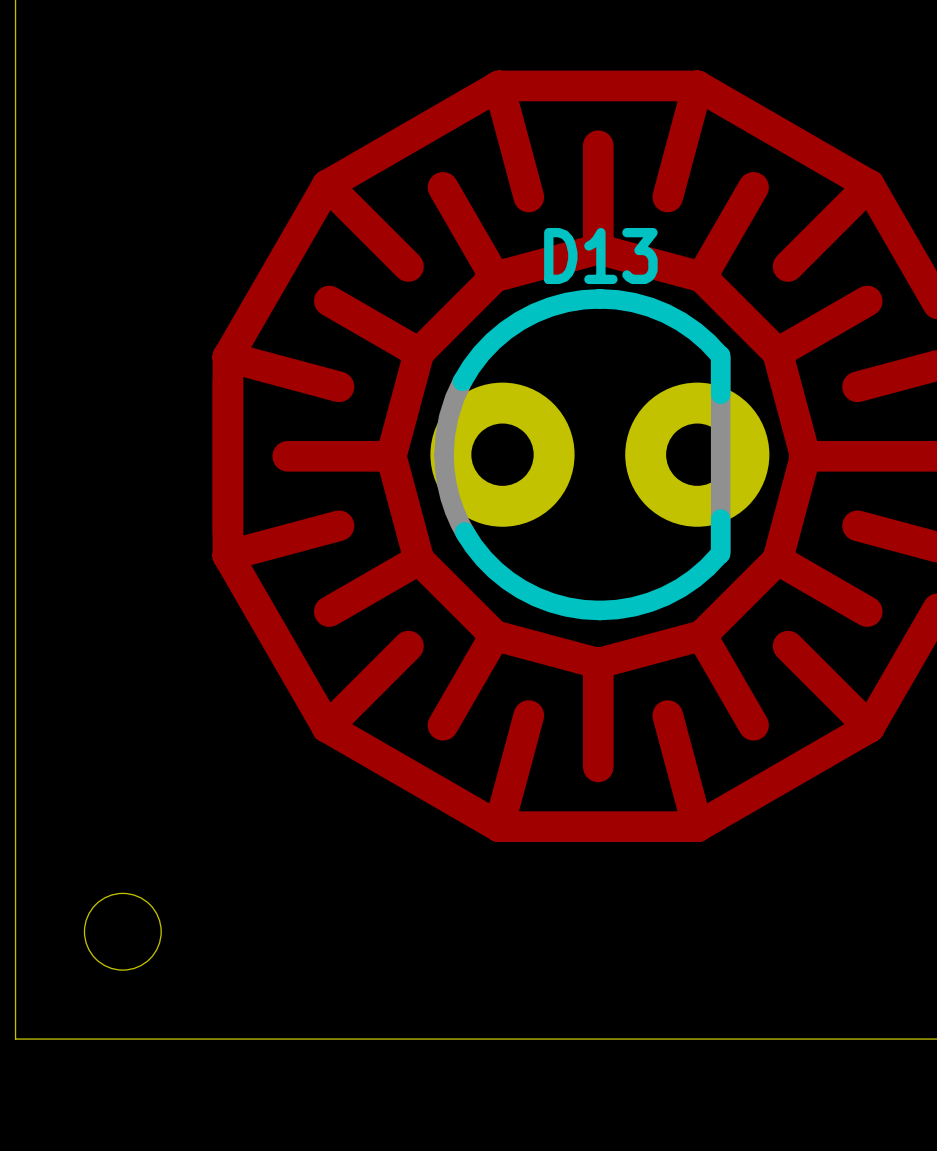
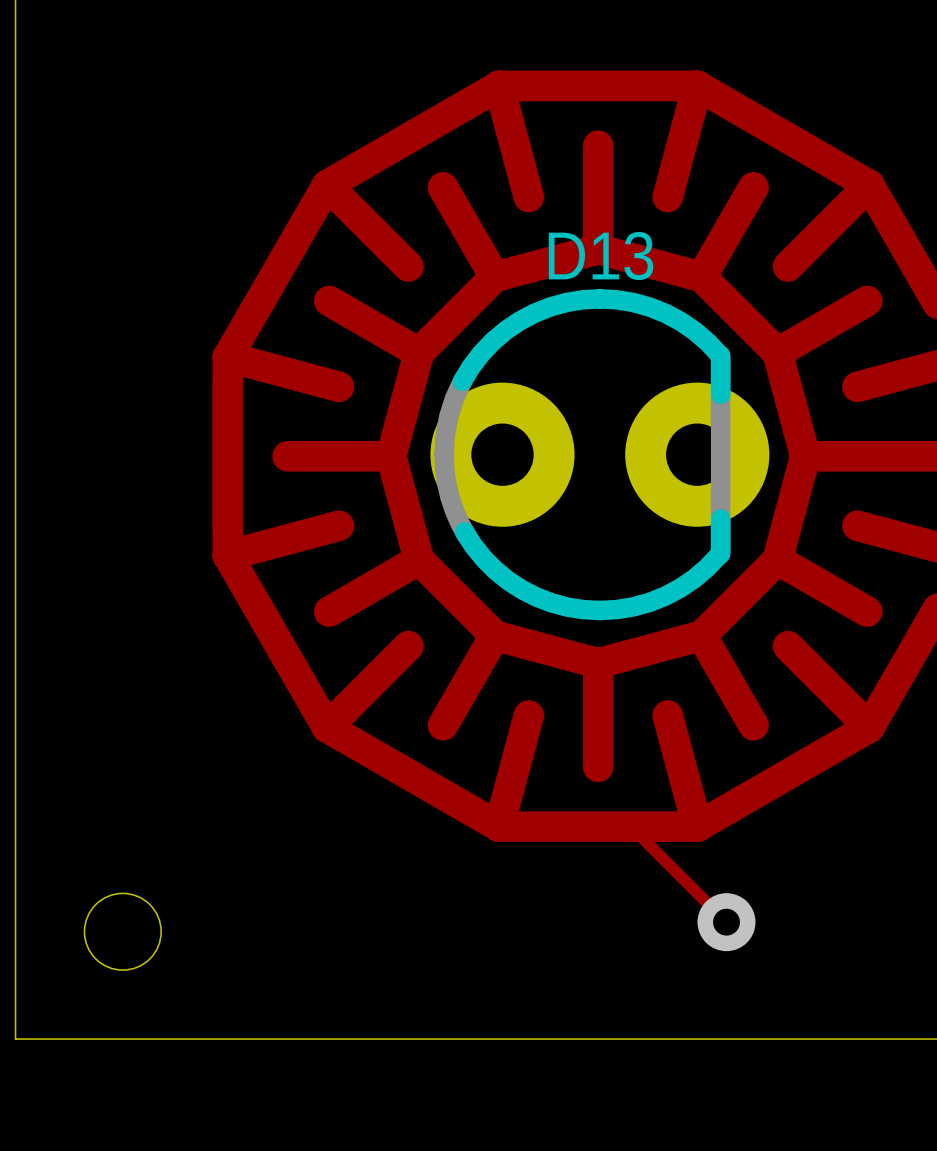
track: none -> (629, 824) (726, 922)
via: none -> (726, 922)

